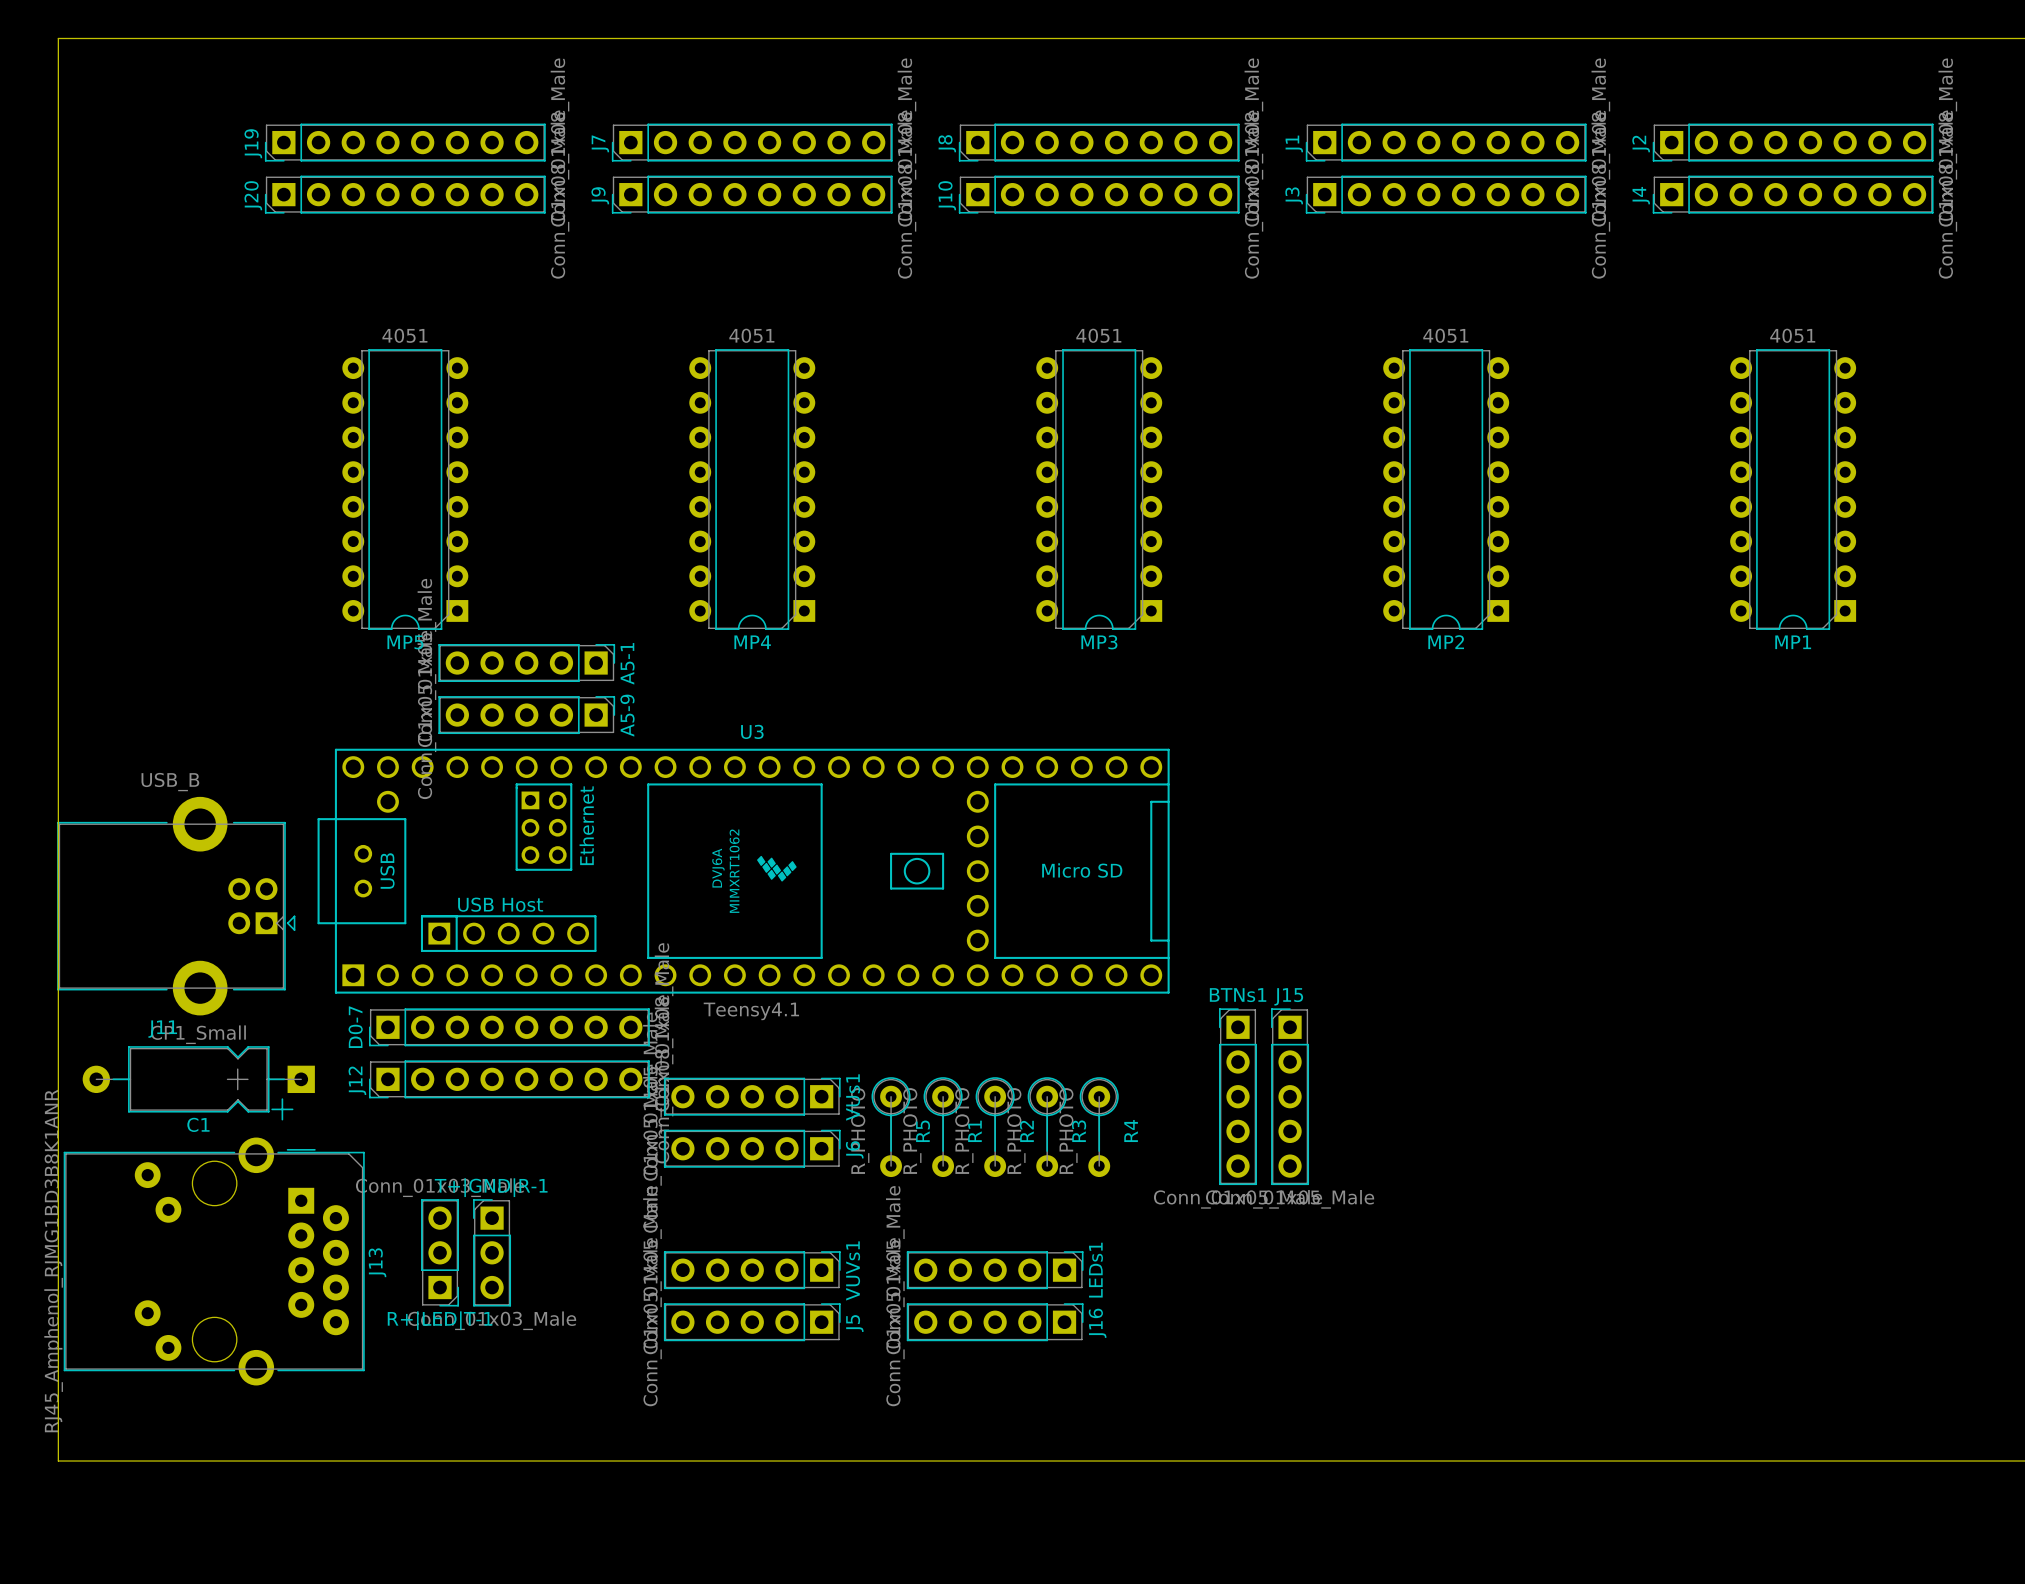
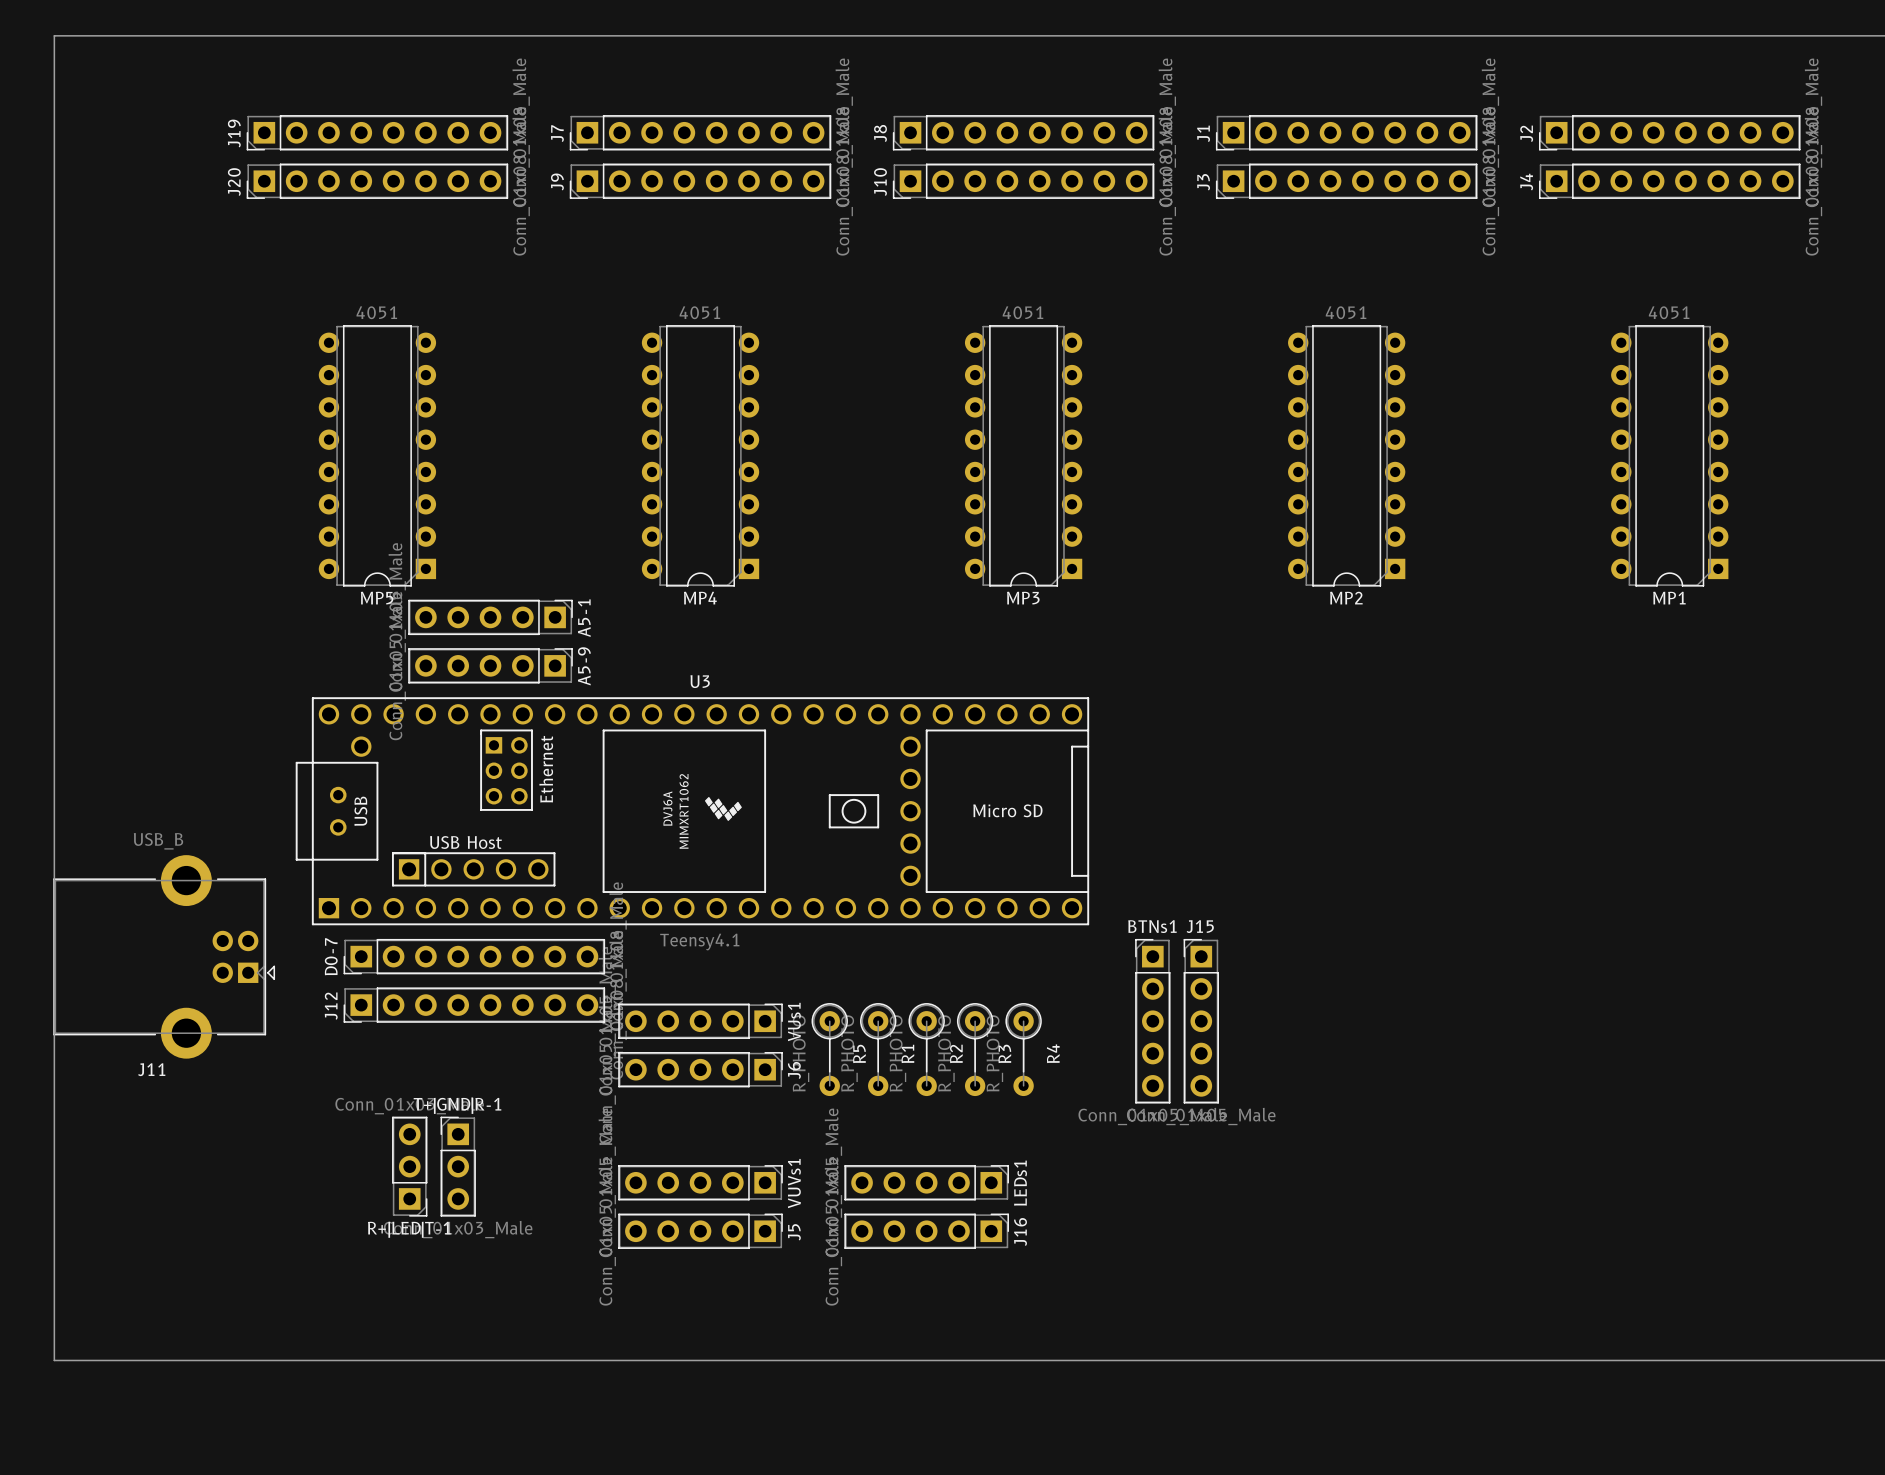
J11 position: (176, 906) -> (164, 956)
C1: CP1_Small (198, 1083) -> none
J13: RJ45_Amphenol_RJMG1BD3B8K1ANR (214, 1261) -> none

